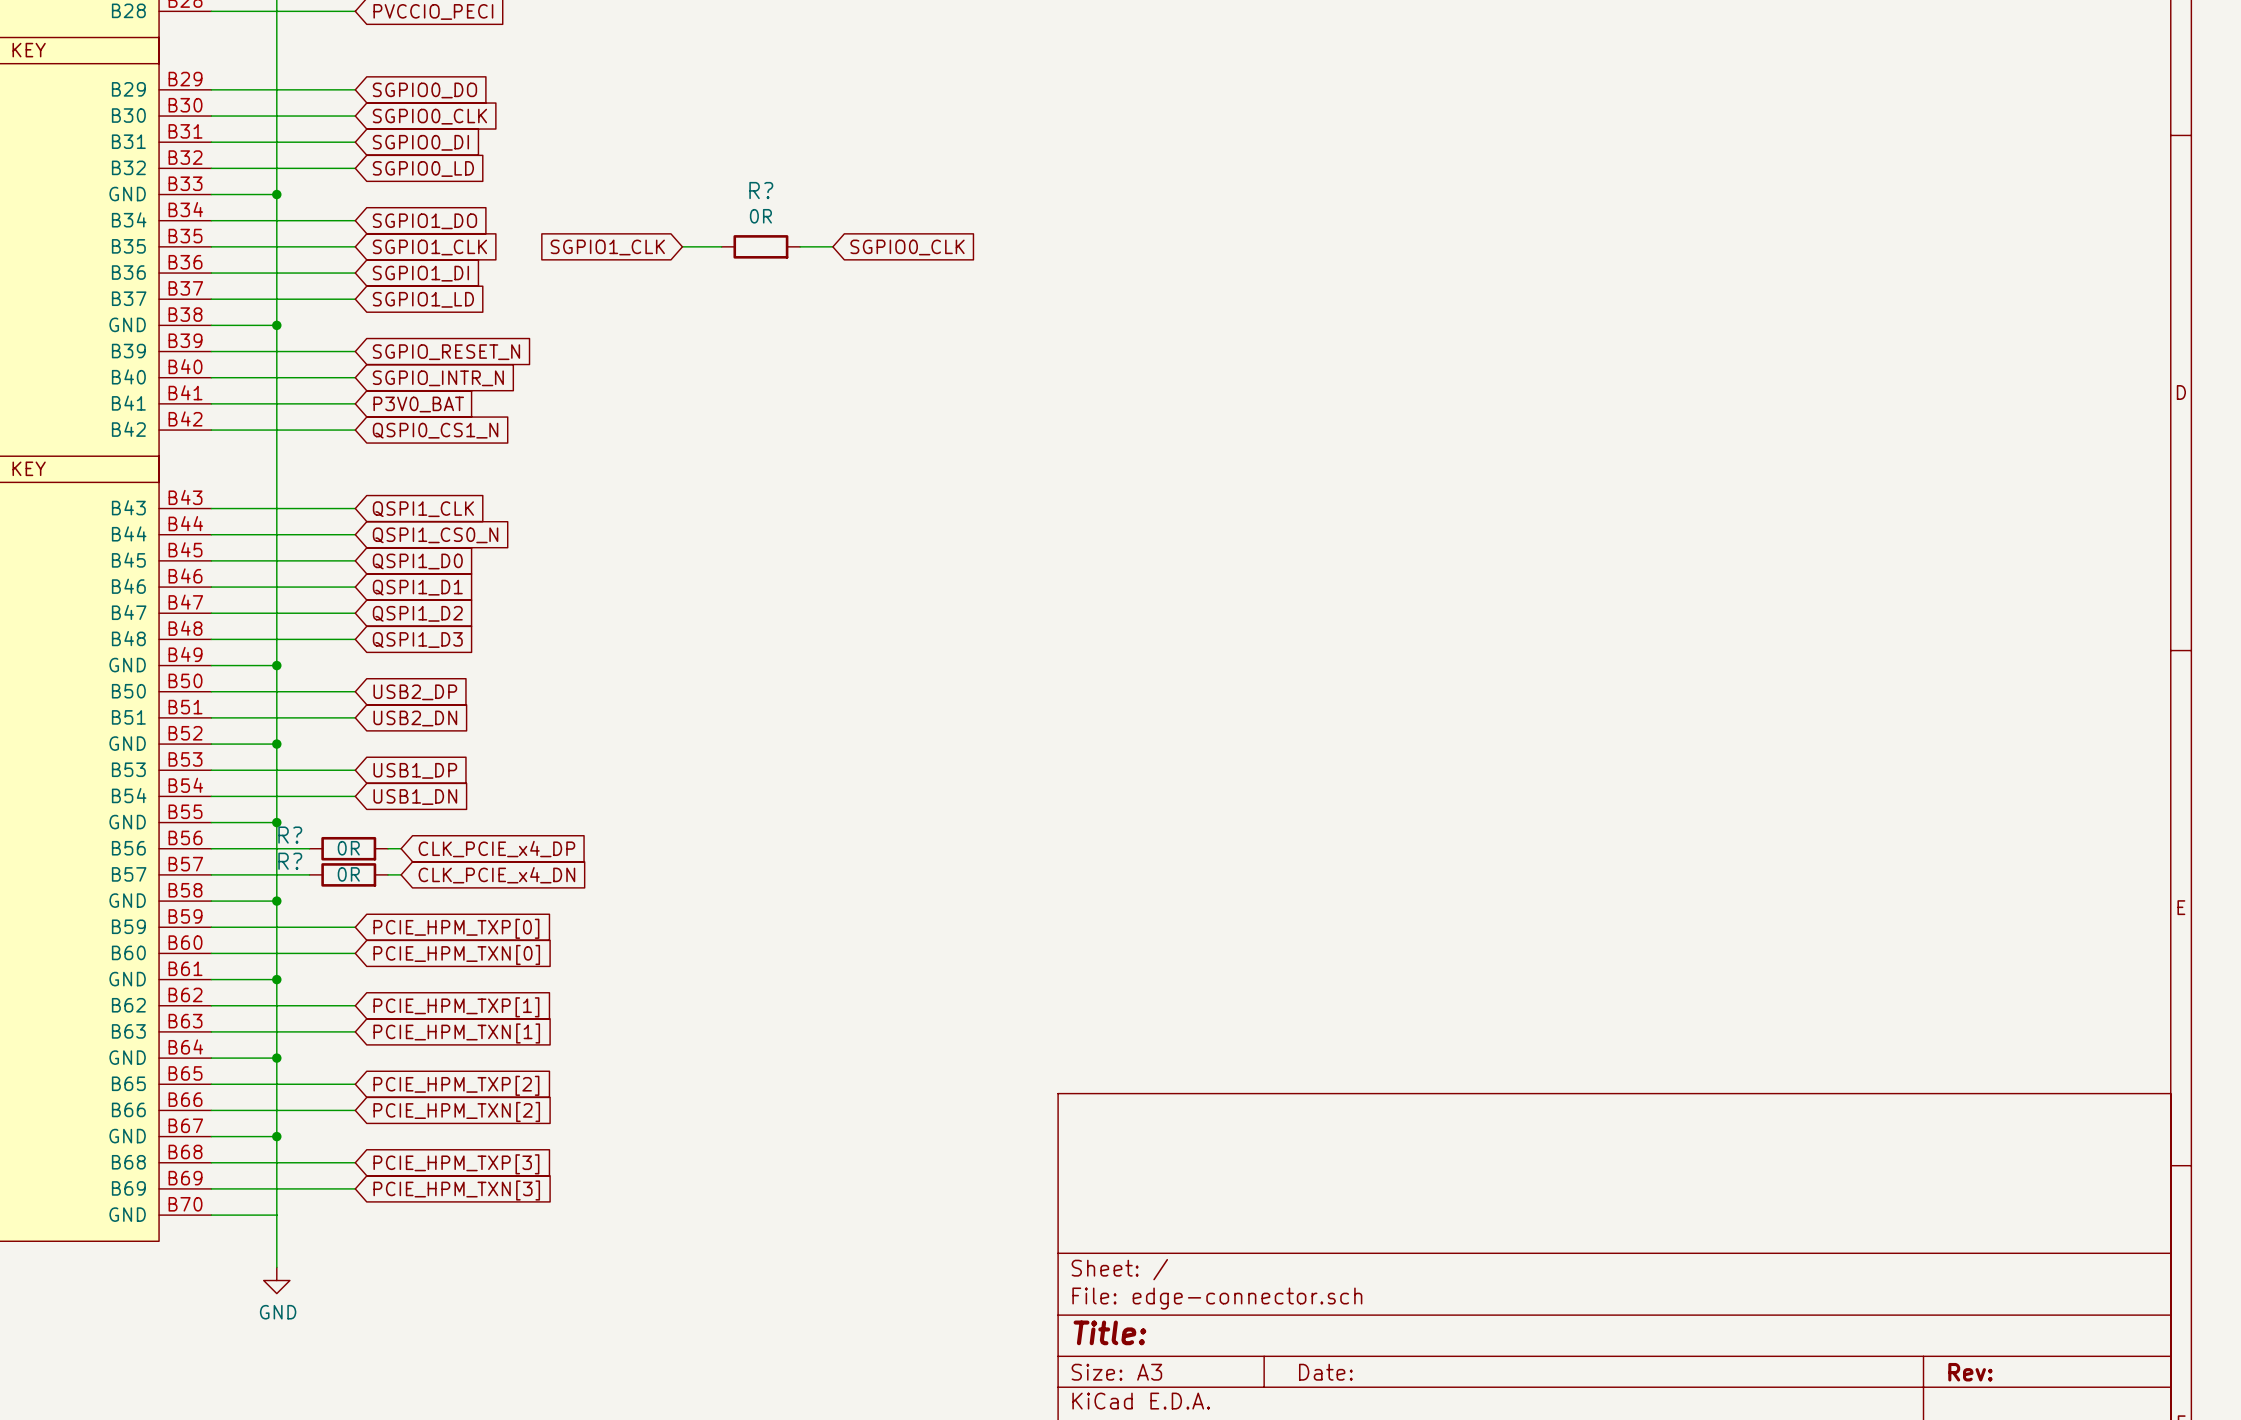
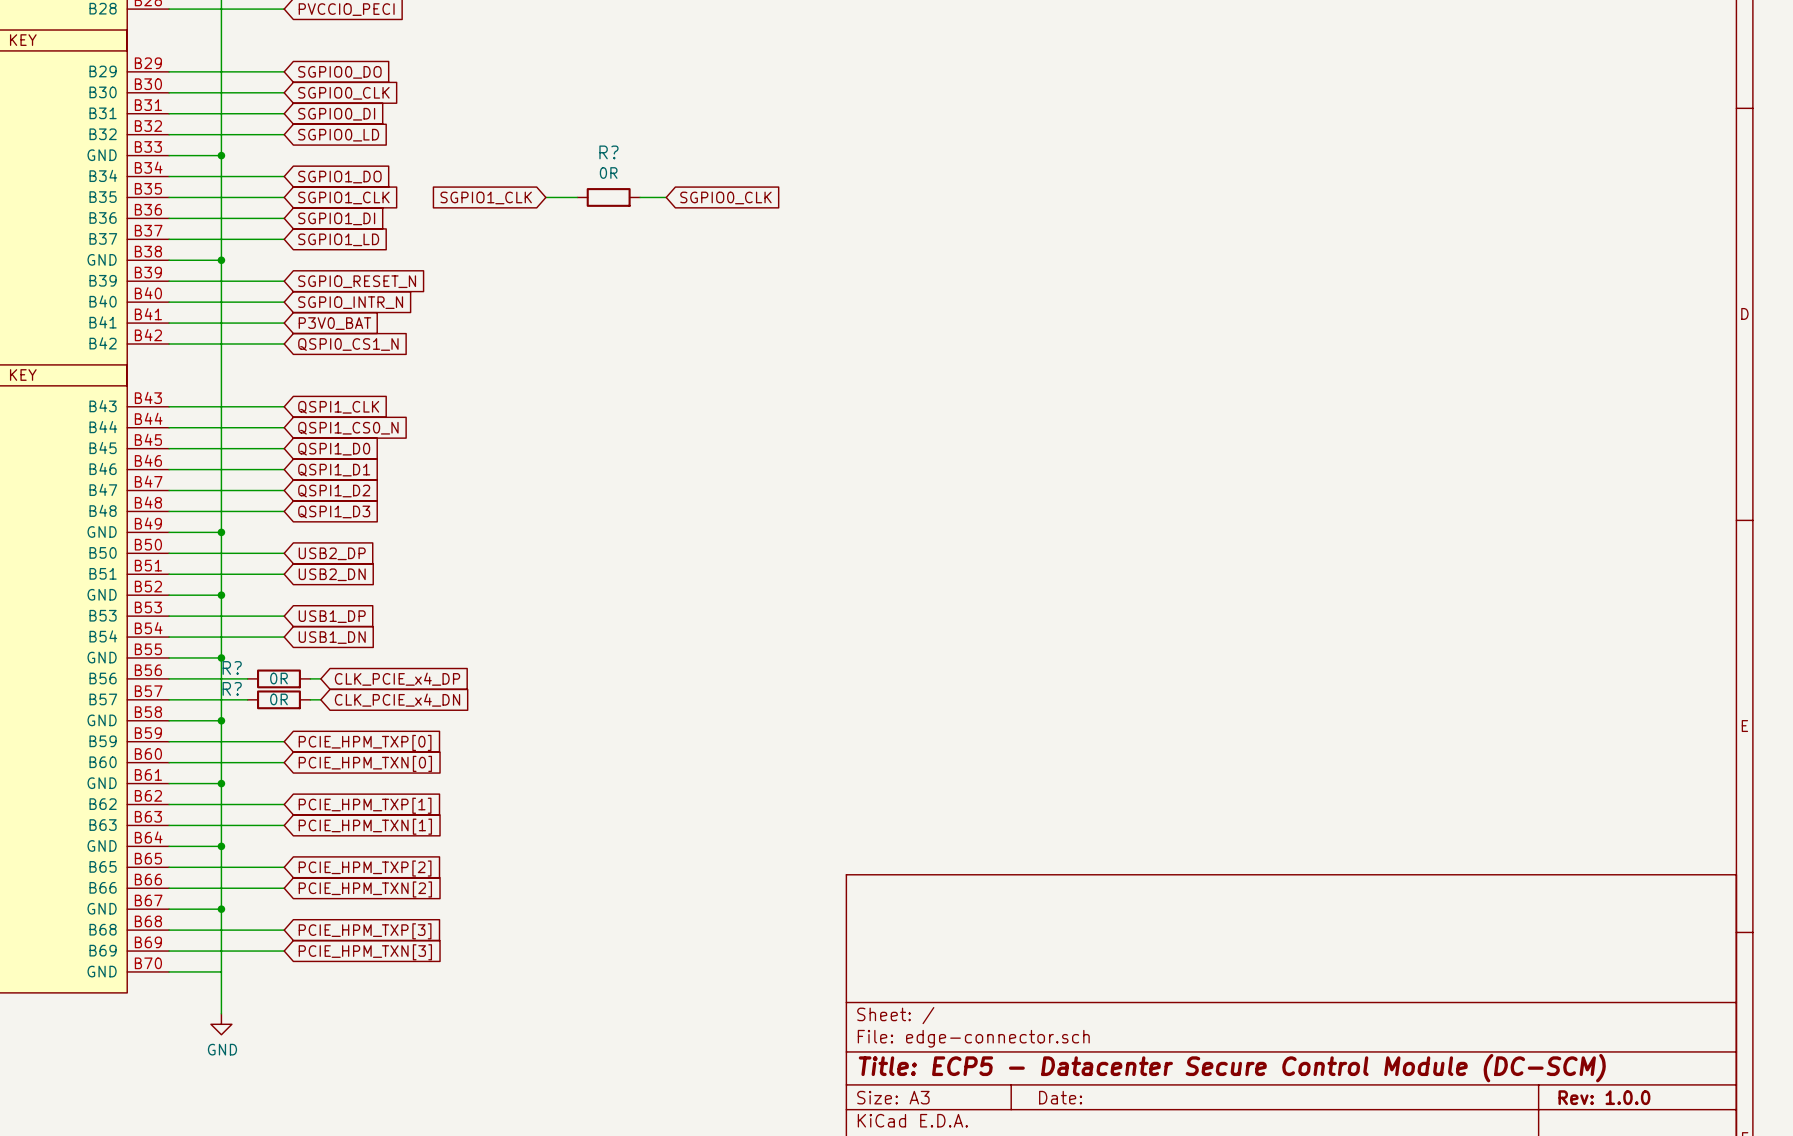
title block: Title: (1109, 1332) -> Title: ECP5 - Datacenter Secure Control Module (DC-SCM) (1232, 1068)
title block: Rev: (1970, 1372) -> Rev: 1.0.0 (1604, 1097)

